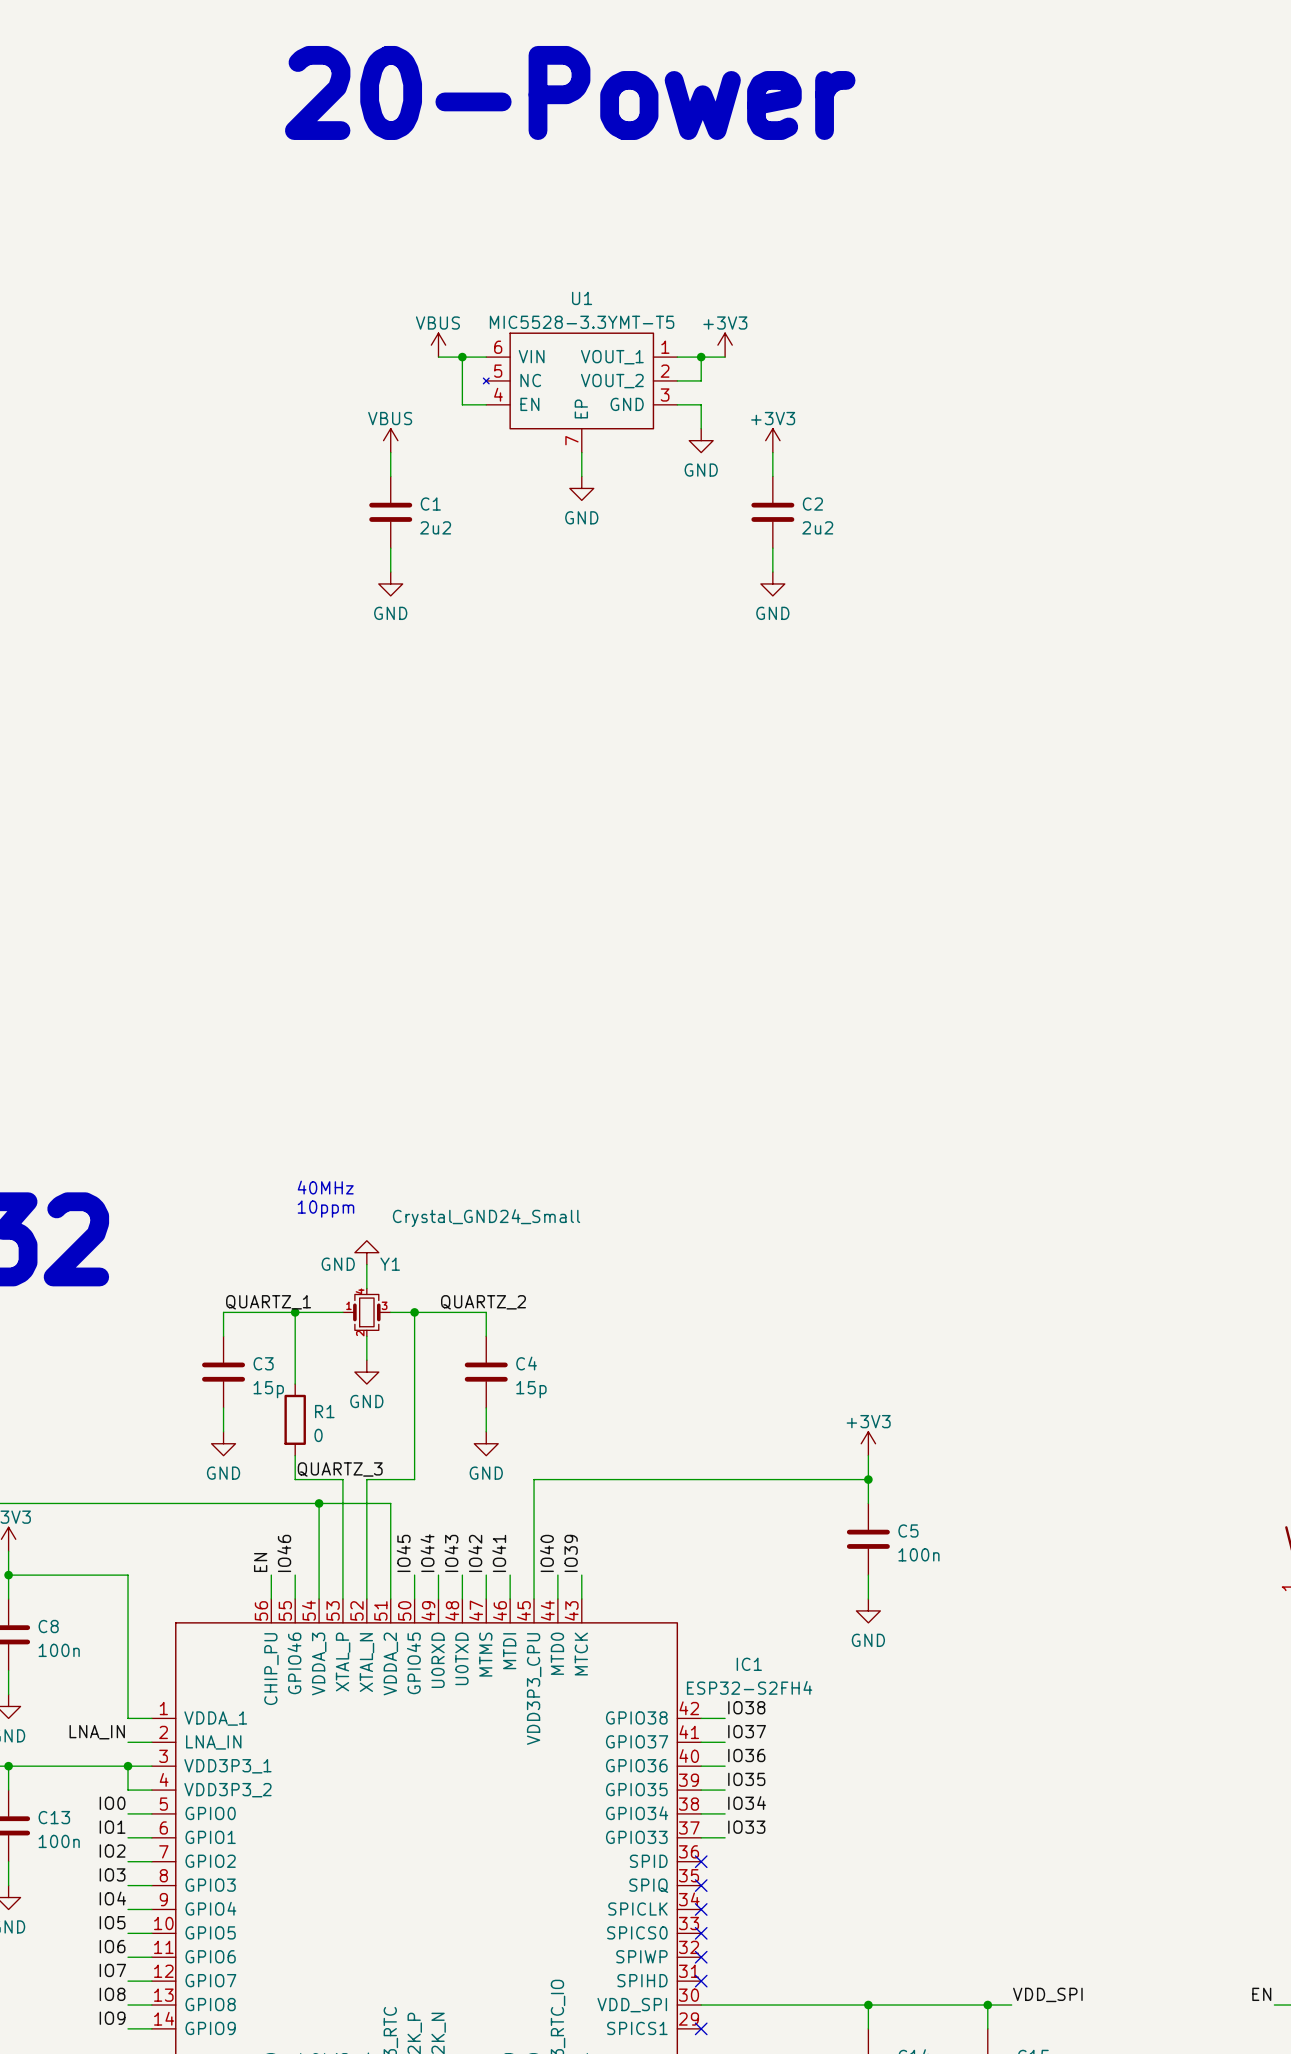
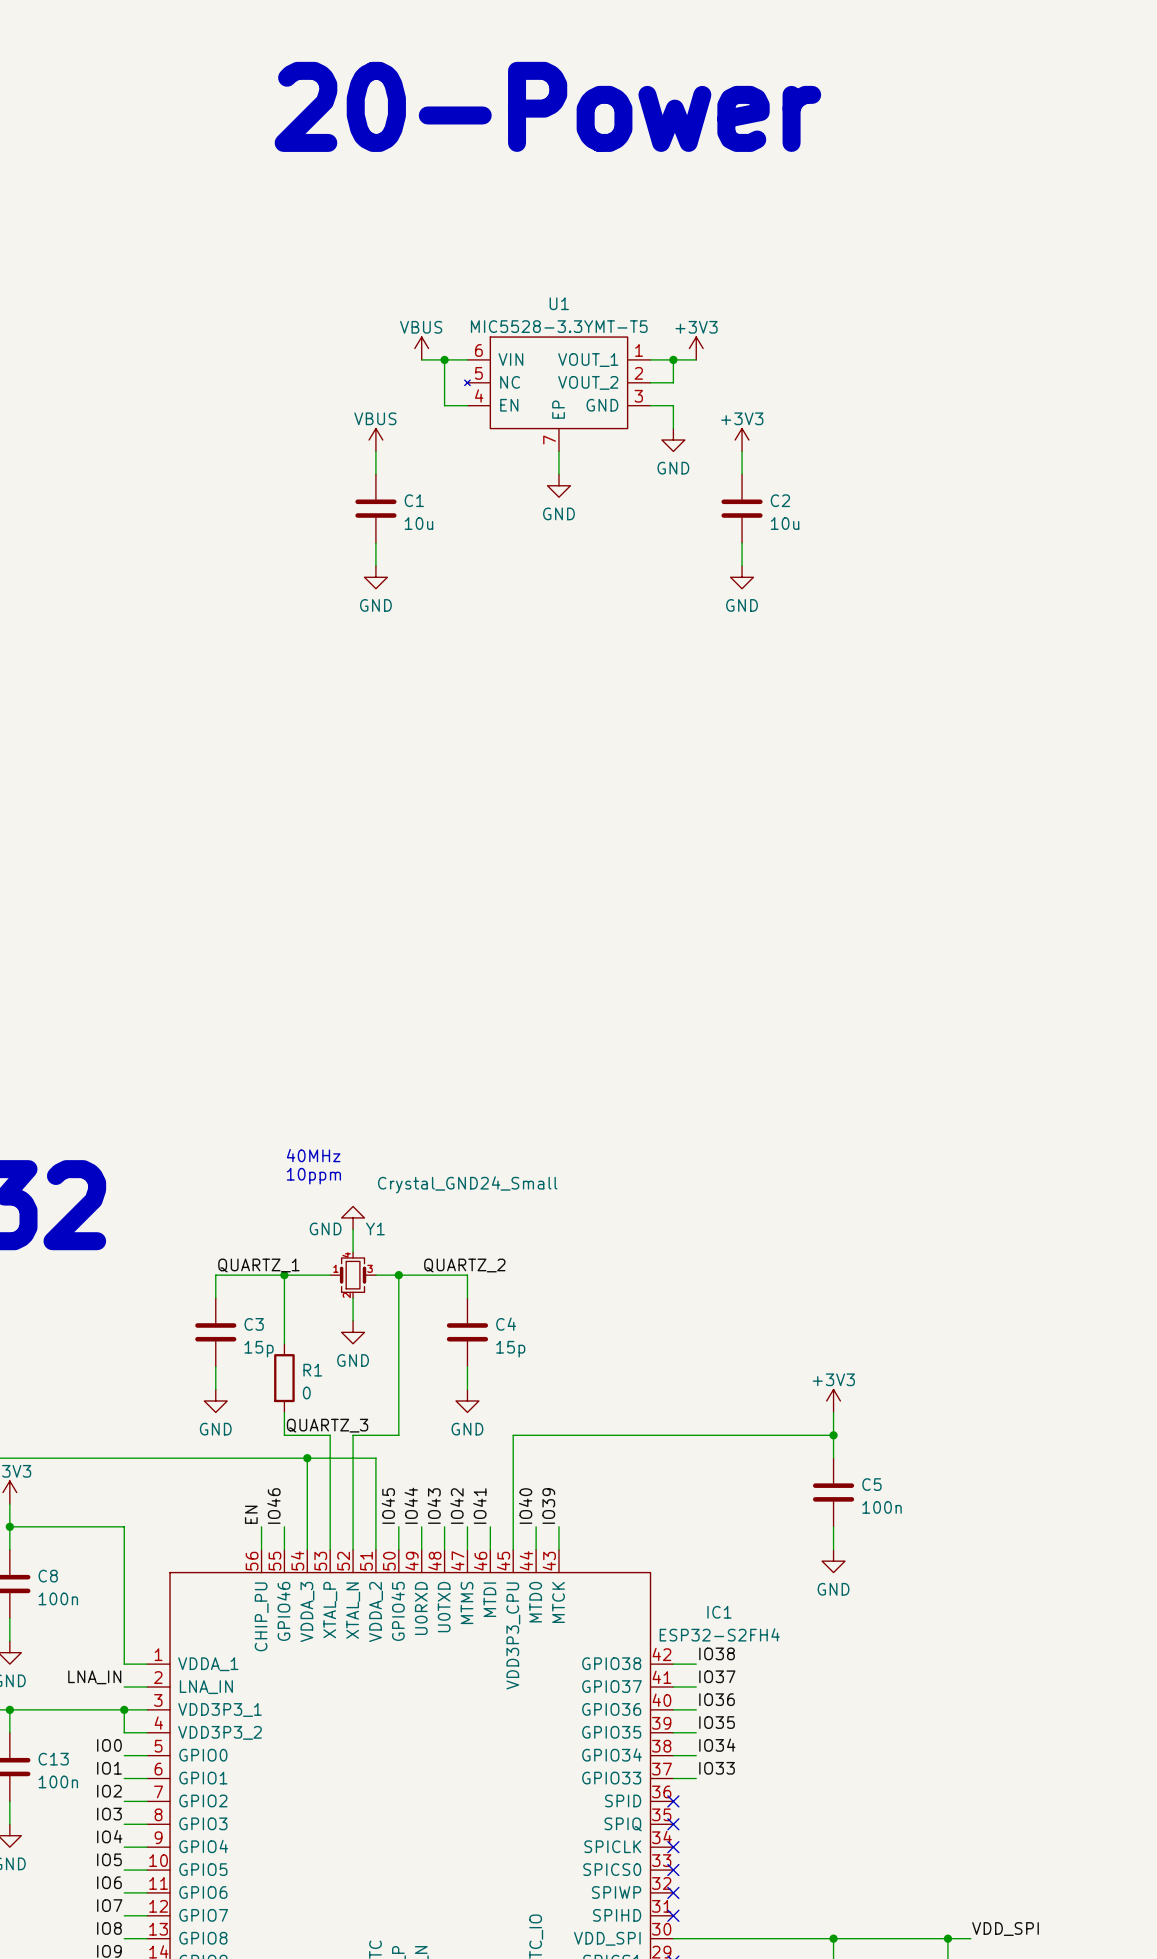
C1 value: 2u2 (435, 527) -> 10u (418, 523)
C2 value: 2u2 (817, 527) -> 10u (785, 523)

